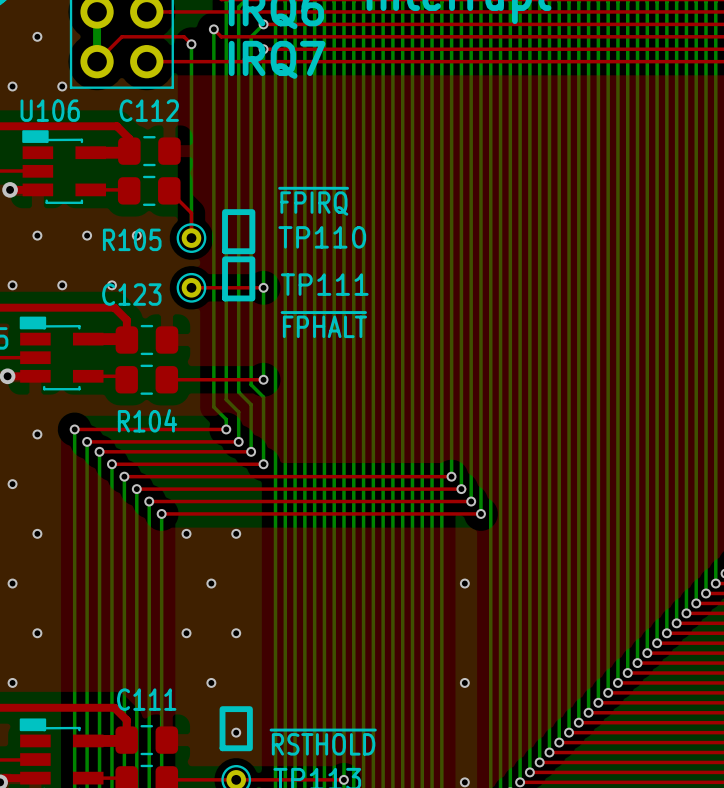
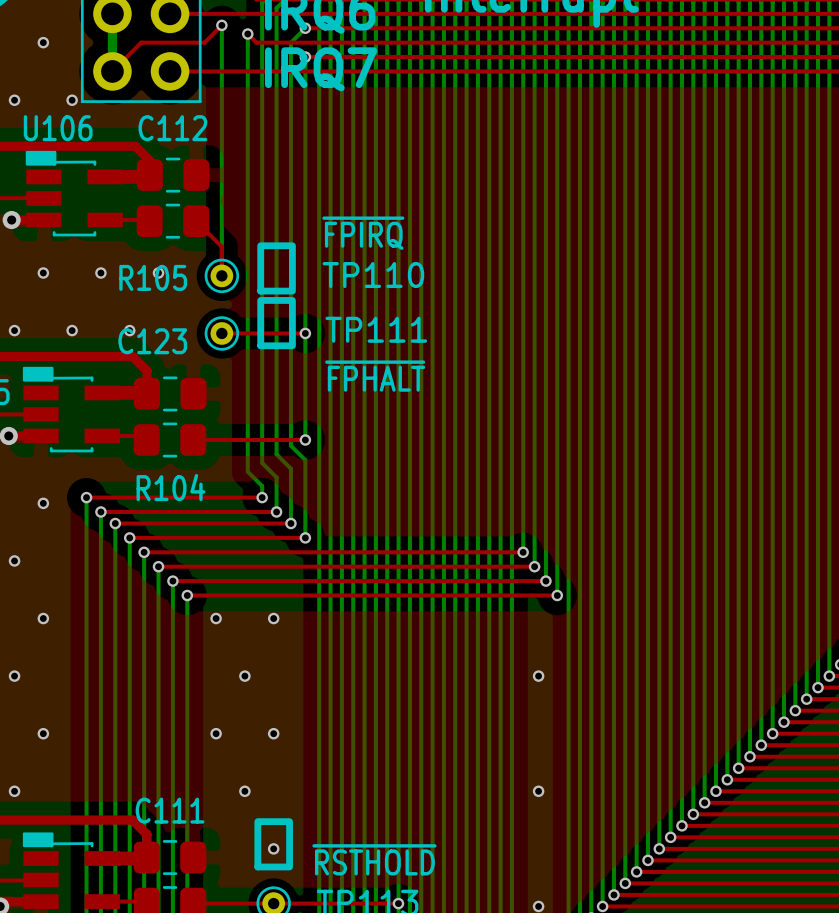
bottom track: none -> (221, 25) (221, 51)
top track: (176, 36) (184, 36) (191, 44) -> (204, 42) (221, 25)
via position: (191, 44) -> (221, 25)

